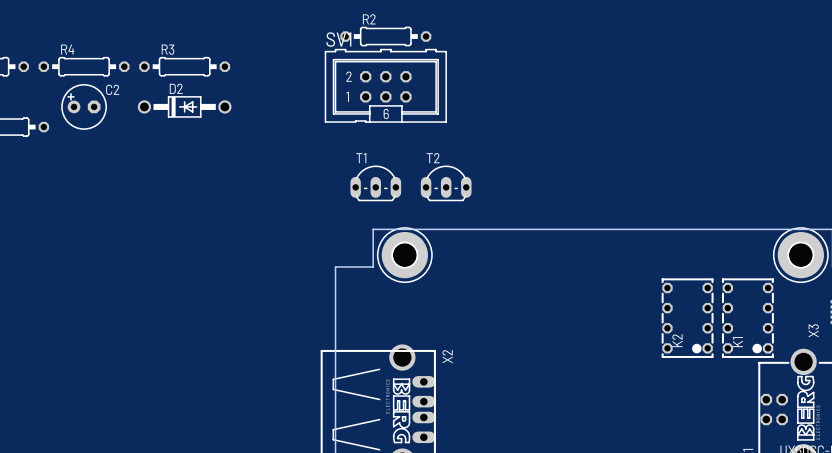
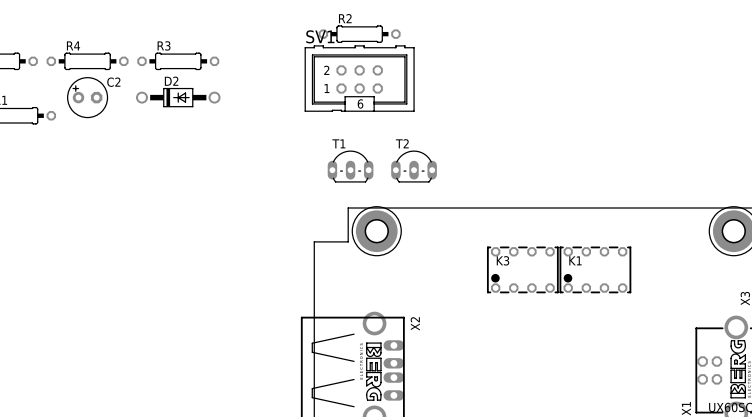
K3: none -> (522, 269)
K2: (687, 318) -> none
K1 rotation: 0° (747, 318) -> 90° clockwise (595, 269)
K1 position: (747, 318) -> (595, 269)

